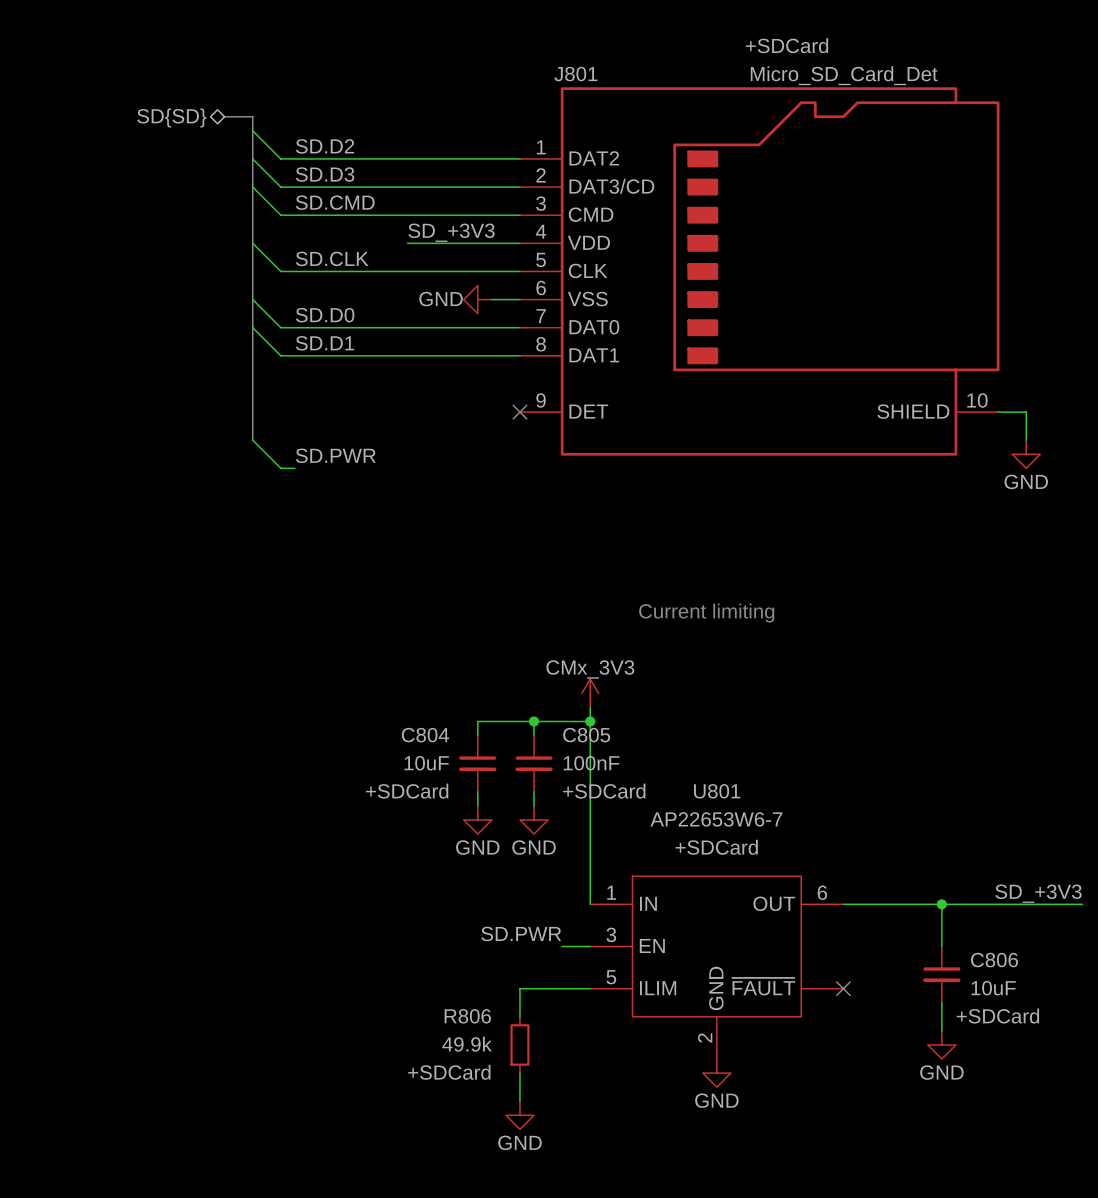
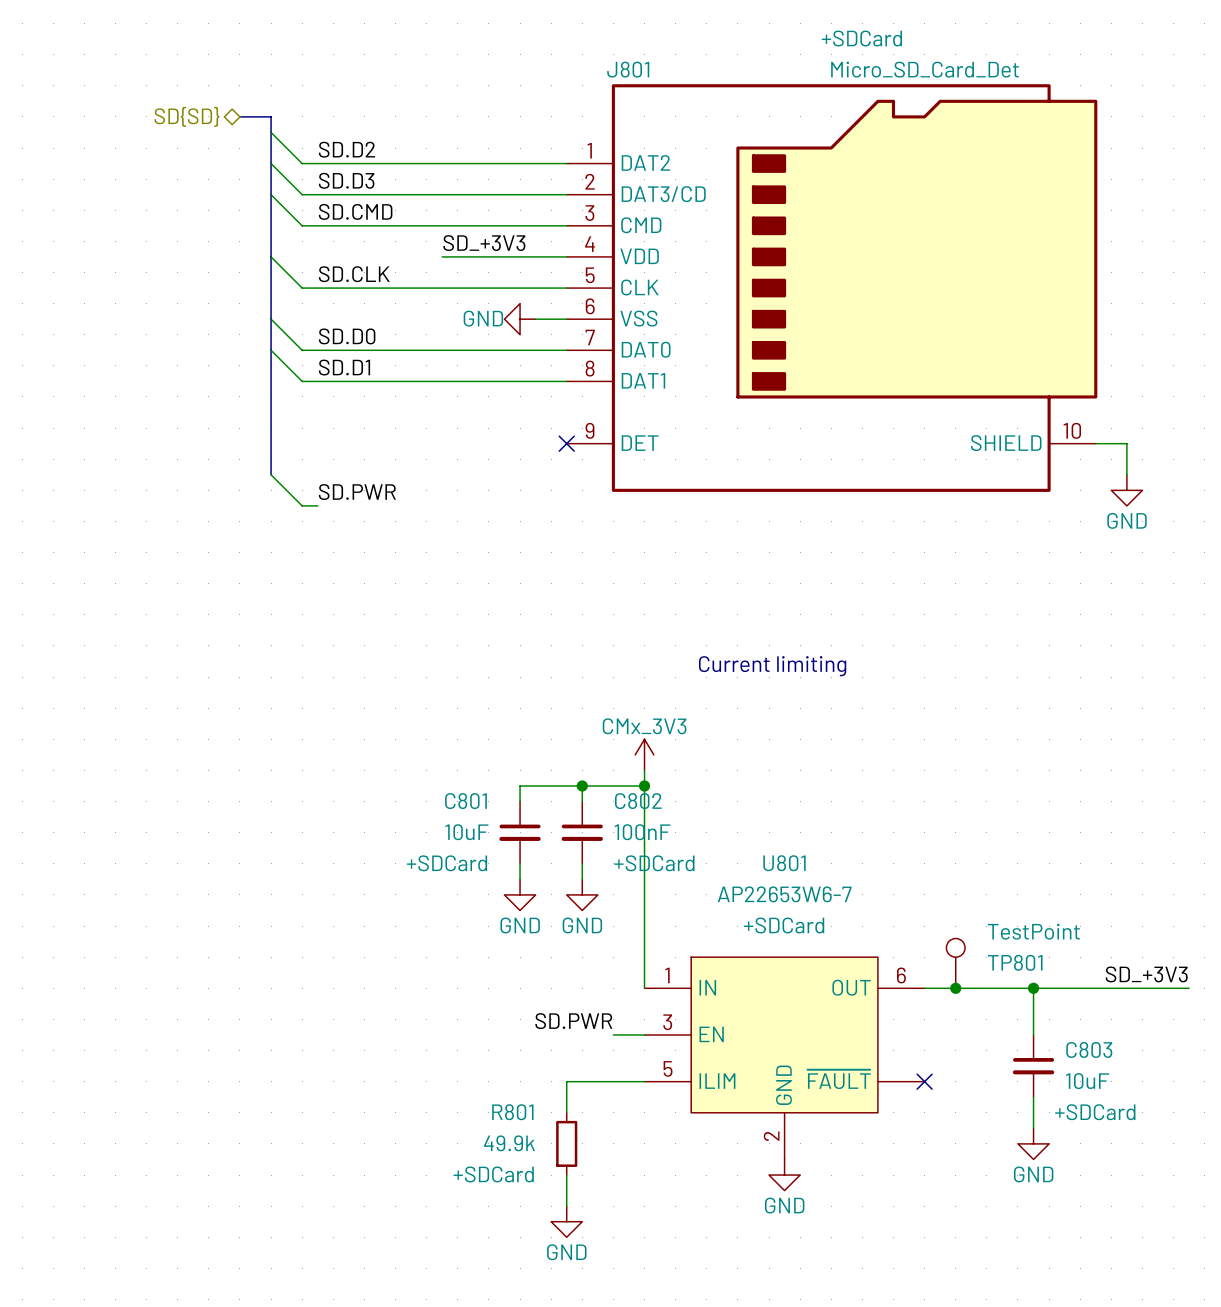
C804 name: C804 (425, 735) -> C801 (465, 801)
C805 name: C805 (586, 735) -> C802 (638, 801)
TP801: none -> TestPoint (955, 963)
junction: none -> (955, 988)
C806 name: C806 (994, 960) -> C803 (1089, 1049)
R806 name: R806 (467, 1016) -> R801 (512, 1112)

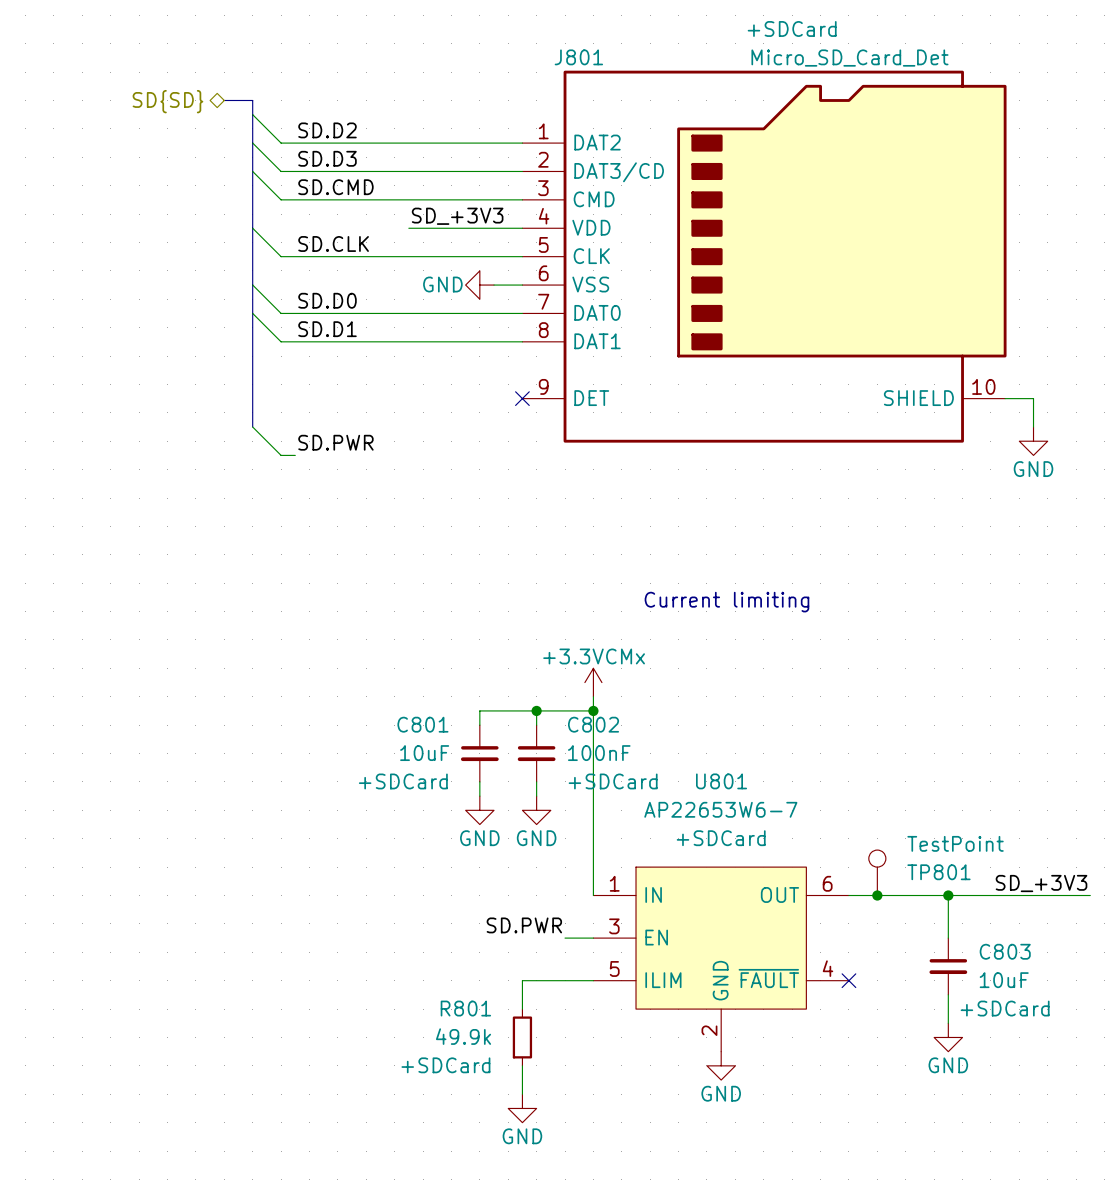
power symbol: CMx_3V3 (644, 754) -> +3.3VCMx (593, 682)
U801 pin number: none -> 4 (828, 968)

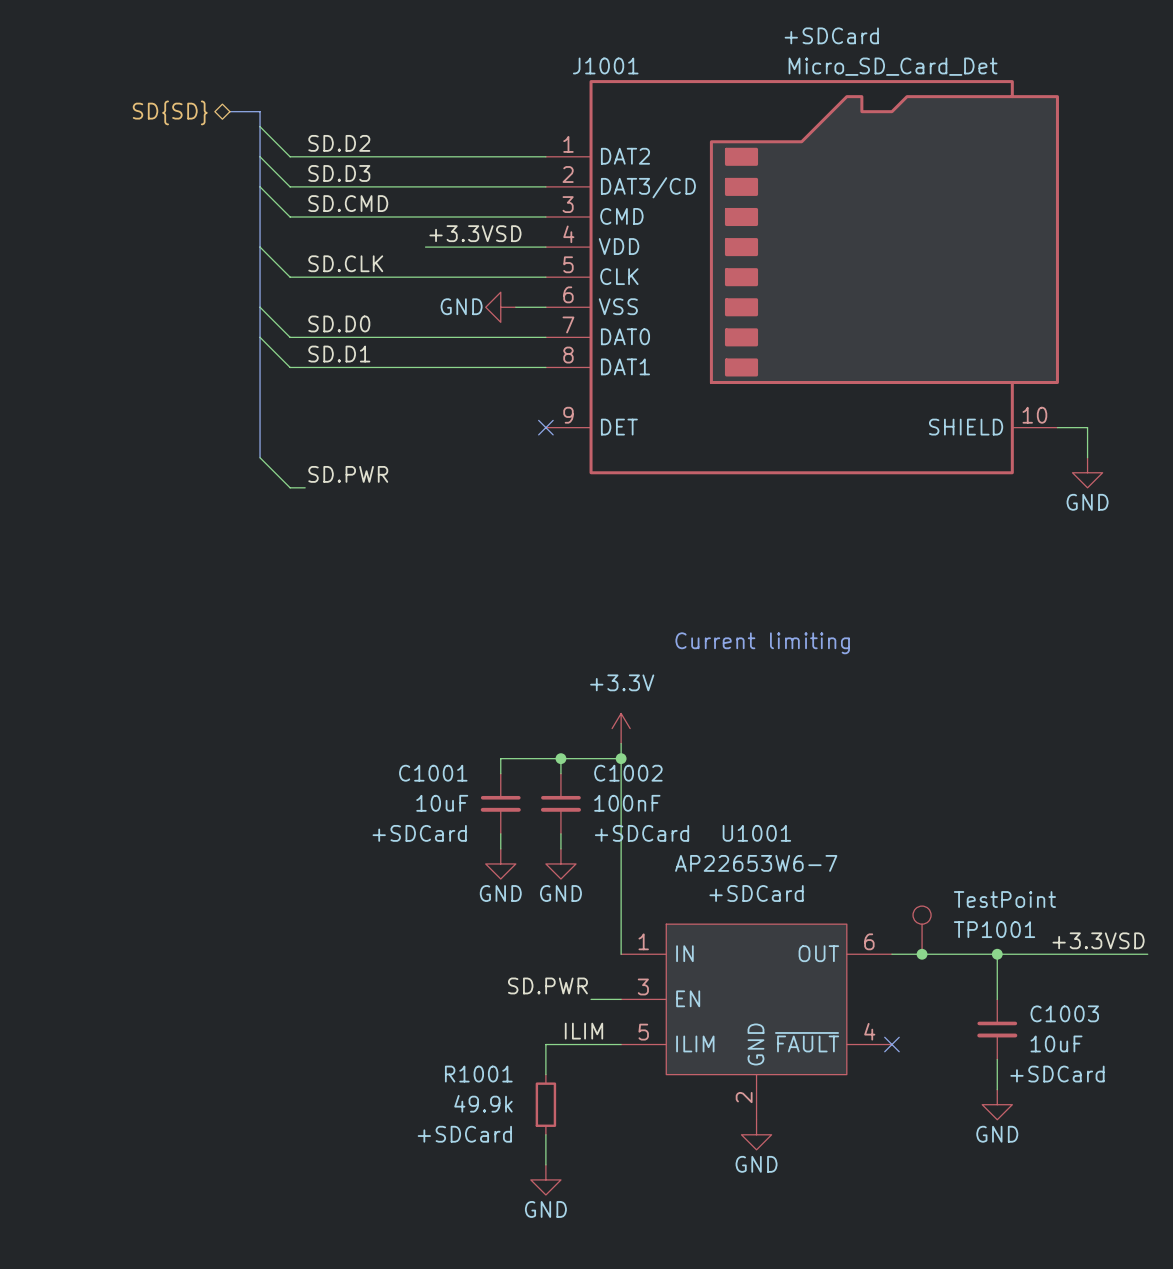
J801 name: J801 (578, 57) -> J1001 (605, 65)
label: SD_+3V3 (457, 216) -> +3.3VSD (475, 233)
power symbol: +3.3VCMx (593, 682) -> +3.3V (621, 728)
C801 name: C801 (422, 724) -> C1001 (433, 773)
C802 name: C802 (593, 724) -> C1002 (628, 773)
U801 name: U801 (721, 781) -> U1001 (756, 833)
TP801 name: TP801 (938, 872) -> TP1001 (994, 929)
label: SD_+3V3 (1041, 883) -> +3.3VSD (1098, 940)
C803 name: C803 (1005, 951) -> C1003 (1064, 1013)
label: none -> ILIM (583, 1031)
R801 name: R801 (465, 1008) -> R1001 (478, 1074)

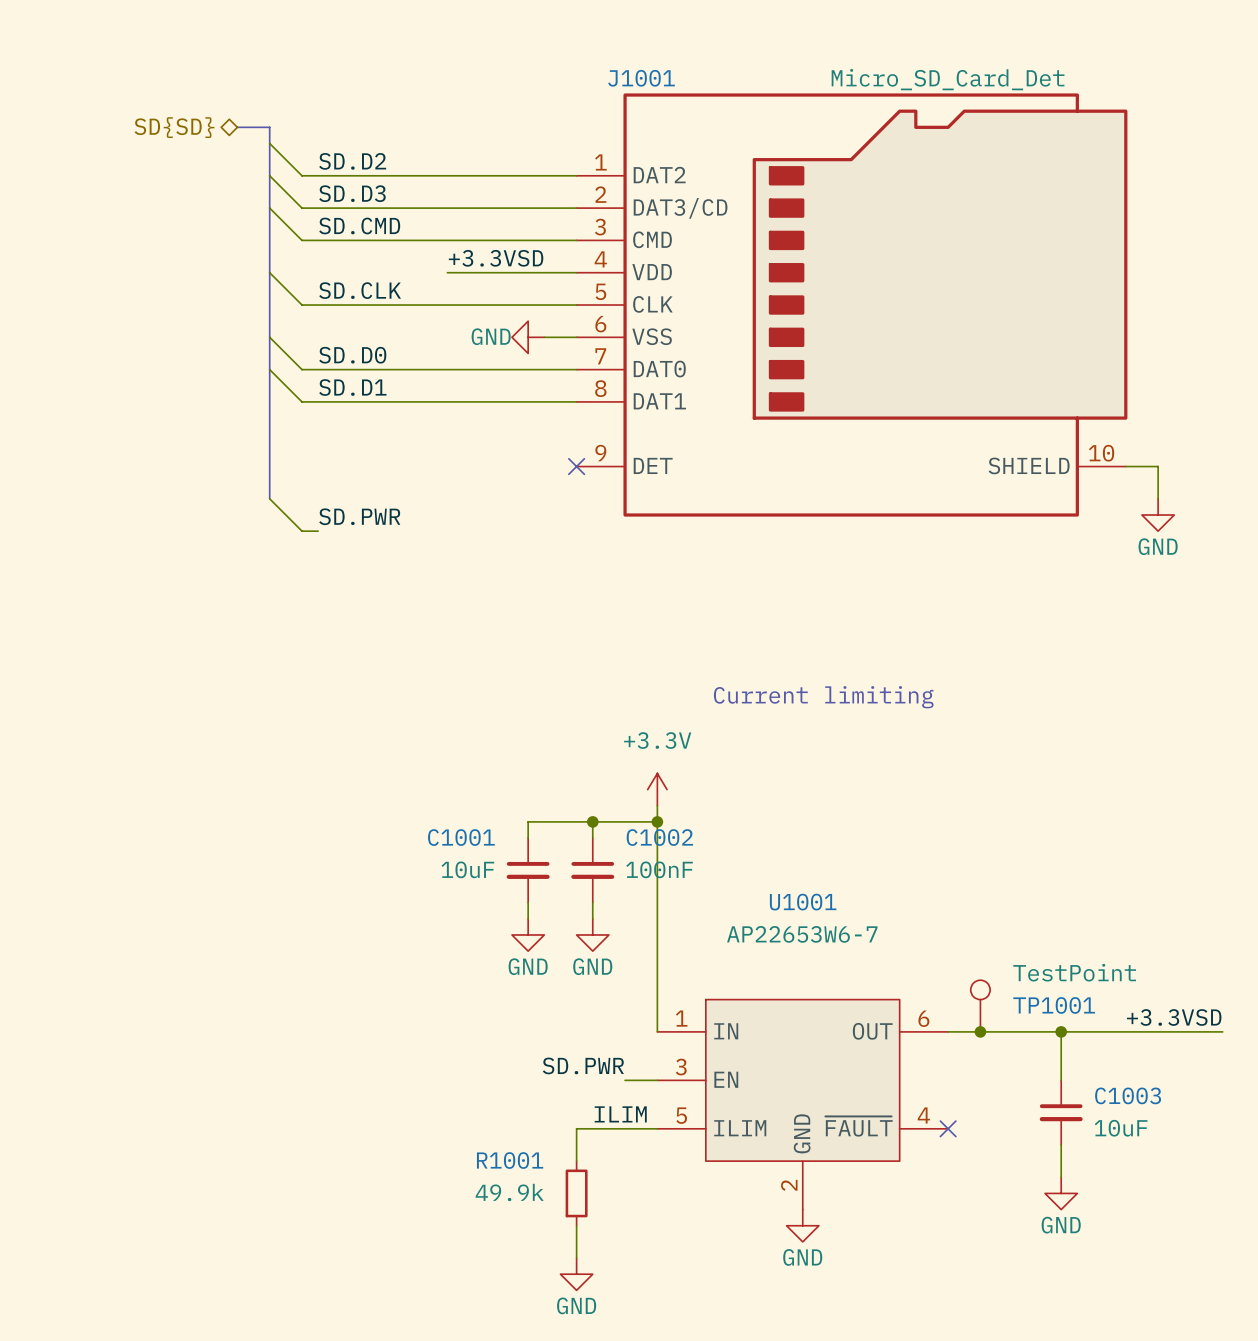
J1001 text: +SDCard (831, 35) -> none
C1001 text: +SDCard (419, 833) -> none
C1002 text: +SDCard (642, 833) -> none
U1001 text: +SDCard (756, 893) -> none
C1003 text: +SDCard (1057, 1074) -> none
R1001 text: +SDCard (464, 1134) -> none

